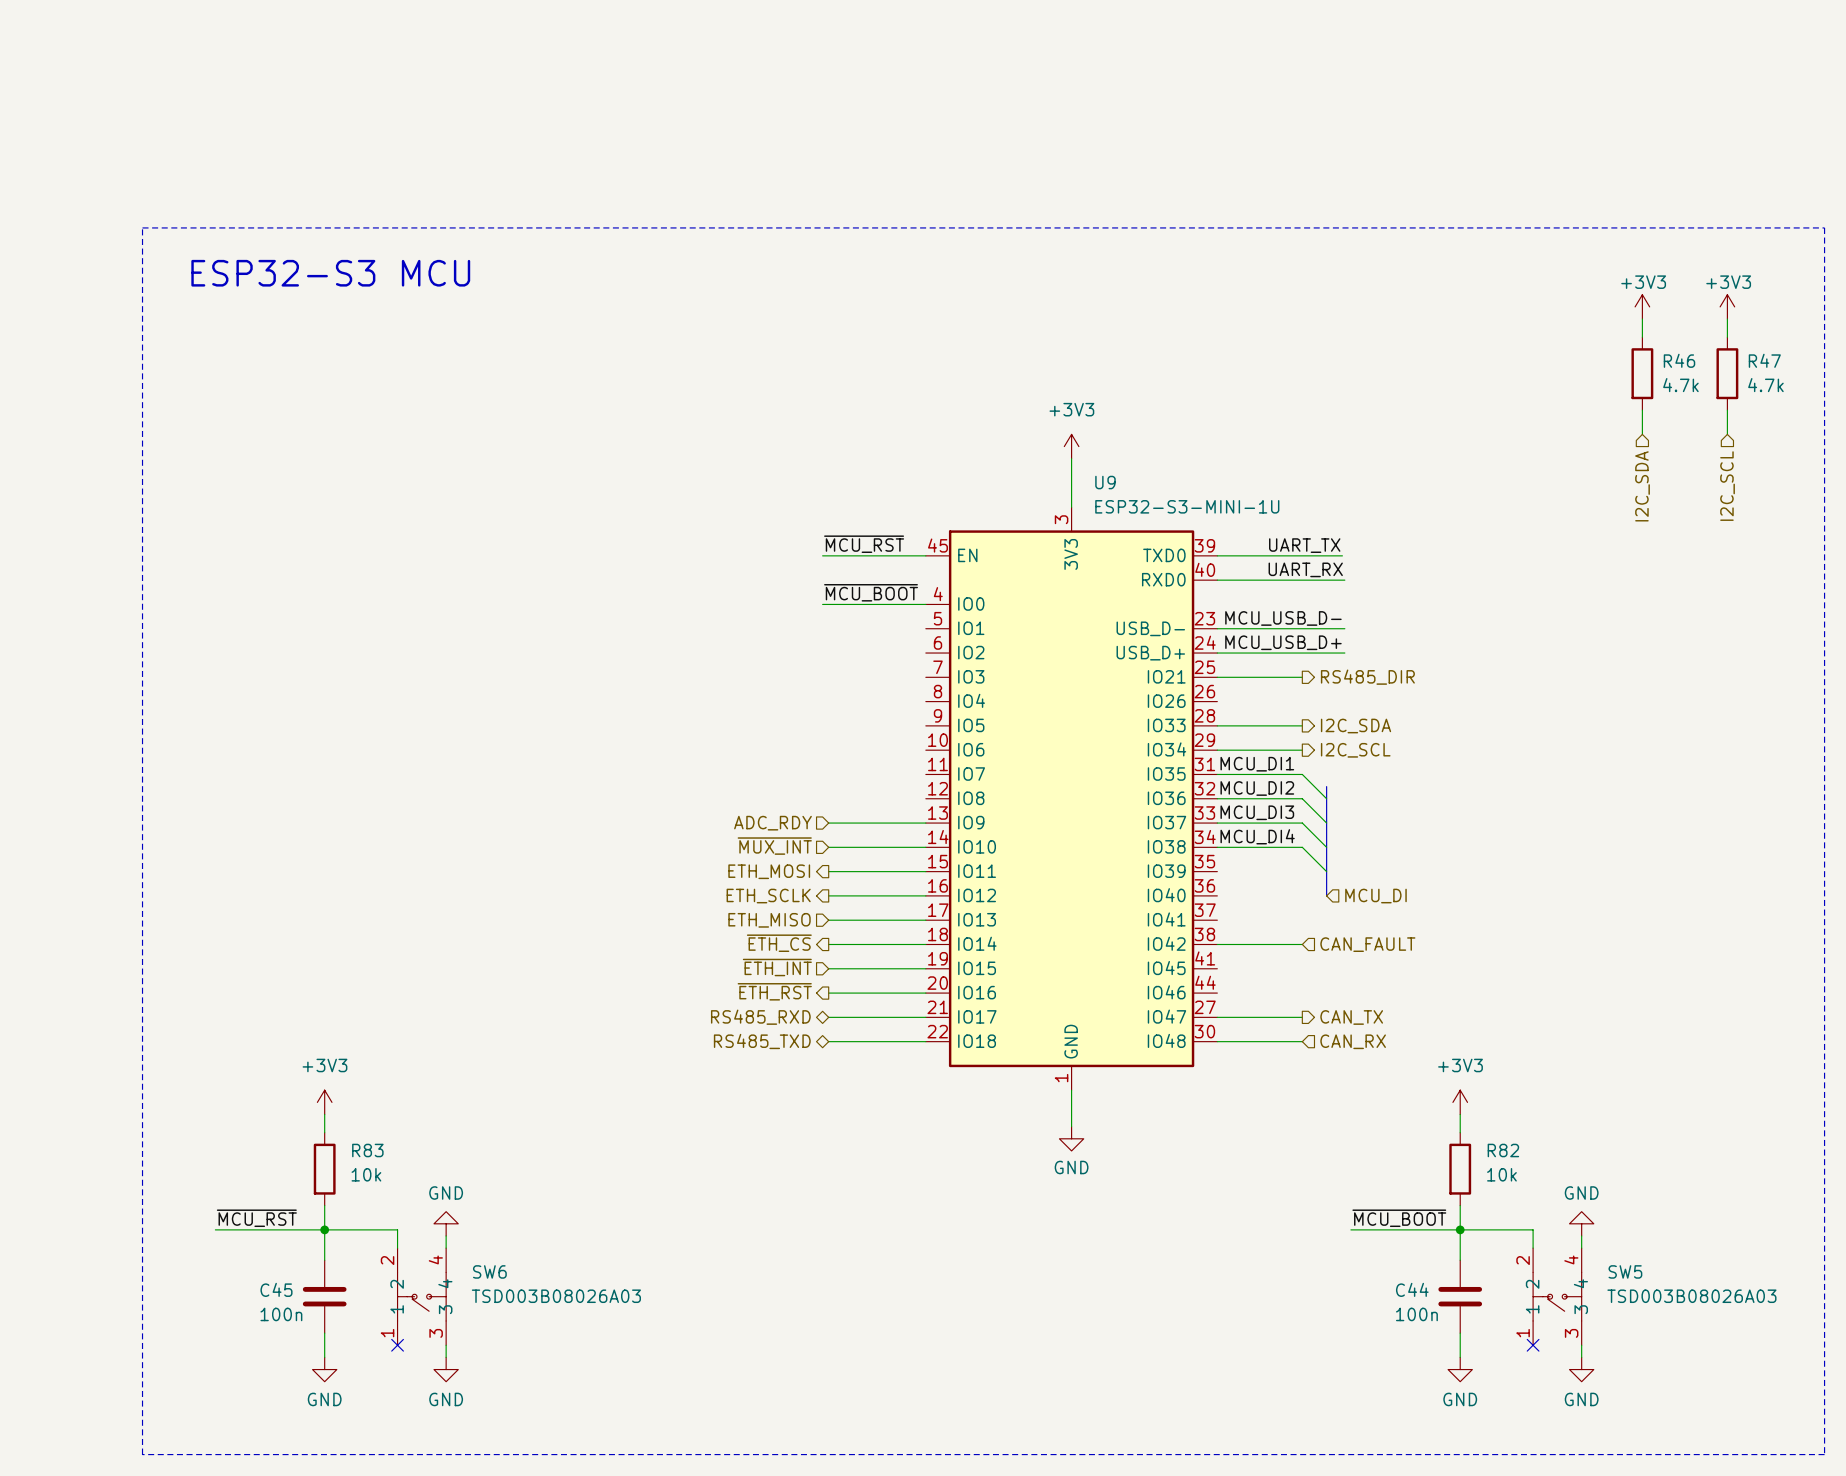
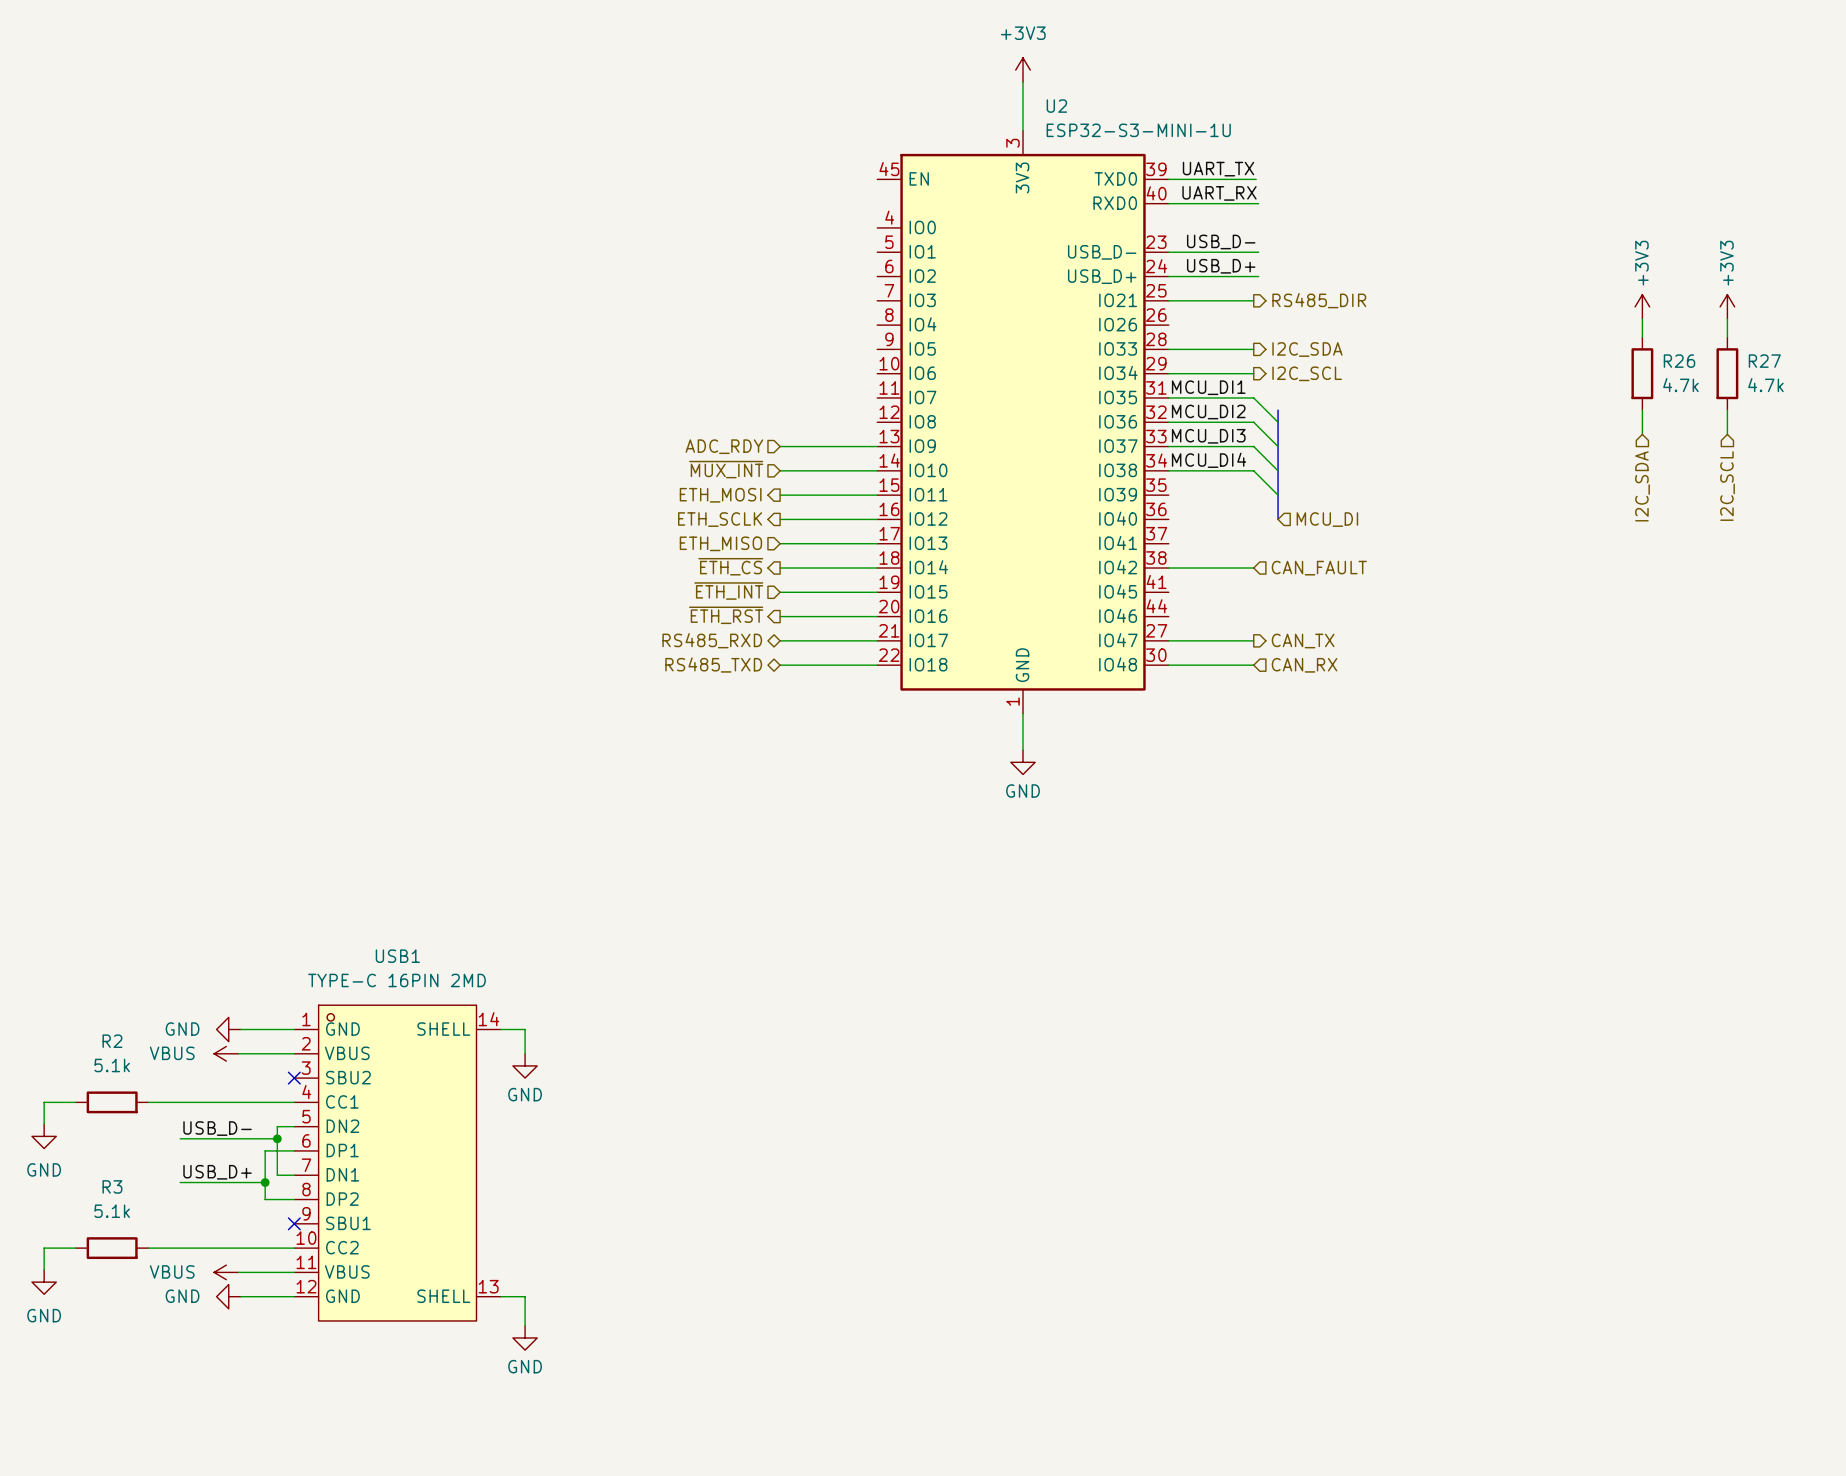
power symbol: none -> +3V3 (1023, 70)
wire: none -> (1023, 82) (1023, 130)
label: none -> UART_TX (1218, 169)
wire: none -> (1168, 179) (1256, 179)
label: none -> UART_RX (1219, 193)
wire: none -> (1168, 203) (1258, 203)
line: (142, 227) (1824, 227) (1824, 1454) (142, 1454) (142, 227) -> none
label: none -> USB_D- (1221, 241)
wire: none -> (1168, 252) (1258, 252)
label: none -> USB_D+ (1221, 266)
text: ESP32-S3 MCU (330, 273) -> none
wire: none -> (1168, 276) (1258, 276)
power symbol text rotation: 0° (1643, 282) -> 90° counterclockwise (1641, 263)
power symbol text rotation: 0° (1728, 282) -> 90° counterclockwise (1726, 263)
wire: none -> (1168, 300) (1253, 300)
hierarchical label: none -> RS485_DIR (1319, 300)
wire: none -> (1168, 349) (1253, 349)
hierarchical label: none -> I2C_SDA (1307, 349)
R46 name: R46 (1679, 360) -> R26 (1679, 361)
R47 name: R47 (1764, 360) -> R27 (1764, 361)
wire: none -> (1168, 373) (1253, 373)
hierarchical label: none -> I2C_SCL (1307, 373)
label: none -> MCU_DI1 (1208, 387)
wire: none -> (1168, 397) (1253, 397) (1278, 422)
bus: none -> (1278, 410) (1278, 519)
label: none -> MCU_DI2 (1208, 412)
U2: none -> ESP32-S3-MINI-1U (1023, 422)
wire: none -> (1168, 422) (1253, 422) (1278, 446)
label: none -> MCU_DI3 (1208, 436)
hierarchical label: none -> ADC_RDY (724, 446)
wire: none -> (780, 446) (877, 446)
power symbol: +3V3 (1071, 446) -> none
wire: none -> (1168, 446) (1253, 446) (1278, 470)
label: none -> MCU_DI4 (1209, 460)
hierarchical label: none -> ~{MUX_INT} (726, 469)
wire: none -> (780, 470) (877, 470)
wire: none -> (1168, 470) (1253, 470) (1278, 495)
hierarchical label: none -> ETH_MOSI (720, 495)
wire: none -> (780, 495) (877, 495)
hierarchical label: none -> ETH_SCLK (720, 519)
wire: none -> (780, 519) (877, 519)
hierarchical label: none -> MCU_DI (1327, 519)
hierarchical label: none -> ETH_MISO (720, 543)
wire: none -> (780, 543) (877, 543)
label: ~{MCU_RST} (864, 544) -> none
label: UART_TX (1304, 545) -> none
wire: (822, 555) (925, 555) -> none
wire: (1217, 555) (1342, 555) -> none
hierarchical label: none -> ~{ETH_CS} (730, 566)
wire: none -> (780, 568) (877, 568)
hierarchical label: none -> CAN_FAULT (1319, 568)
label: UART_RX (1305, 569) -> none
wire: (1217, 580) (1344, 580) -> none
hierarchical label: none -> ~{ETH_INT} (728, 591)
label: ~{MCU_BOOT} (871, 592) -> none
wire: (822, 604) (925, 604) -> none
hierarchical label: none -> ~{ETH_RST} (726, 615)
label: MCU_USB_D- (1283, 618) -> none
wire: (1217, 628) (1344, 628) -> none
hierarchical label: none -> RS485_RXD (712, 640)
hierarchical label: none -> CAN_TX (1303, 641)
label: MCU_USB_D+ (1283, 642) -> none
wire: (1217, 653) (1344, 653) -> none
hierarchical label: none -> RS485_TXD (713, 665)
hierarchical label: none -> CAN_RX (1304, 665)
wire: (1217, 677) (1302, 677) -> (1168, 665) (1253, 665)
hierarchical label: RS485_DIR (1367, 677) -> none
wire: (1217, 725) (1302, 725) -> (1168, 640) (1253, 640)
hierarchical label: I2C_SDA (1356, 726) -> none
wire: (1217, 750) (1302, 750) -> (1168, 568) (1253, 568)
hierarchical label: I2C_SCL (1355, 750) -> none
power symbol: none -> GND (1023, 762)
label: MCU_DI1 (1257, 764) -> none
wire: (1217, 774) (1302, 774) (1326, 798) -> none
bus: (1326, 786) (1326, 895) -> none
label: MCU_DI2 (1257, 788) -> none
U9: ESP32-S3-MINI-1U (1071, 798) -> none
wire: (1217, 798) (1302, 798) (1326, 823) -> none
label: MCU_DI3 (1257, 812) -> none
hierarchical label: ADC_RDY (772, 823) -> none
wire: (828, 823) (925, 823) -> (780, 592) (877, 592)
wire: (1217, 823) (1302, 823) (1326, 847) -> none
label: MCU_DI4 (1257, 836) -> none
hierarchical label: ~{MUX_INT} (774, 846) -> none
wire: (828, 847) (925, 847) -> (780, 616) (877, 616)
wire: (1217, 847) (1302, 847) (1326, 871) -> none
hierarchical label: ETH_MOSI (769, 871) -> none
wire: (828, 871) (925, 871) -> (780, 640) (877, 640)
wire: (828, 895) (925, 895) -> (780, 665) (877, 665)
hierarchical label: ETH_SCLK (768, 896) -> none
hierarchical label: MCU_DI (1375, 896) -> none
hierarchical label: ETH_MISO (769, 920) -> none
wire: (828, 920) (925, 920) -> none
hierarchical label: ~{ETH_CS} (779, 943) -> none
wire: (828, 944) (925, 944) -> none
wire: (1217, 944) (1302, 944) -> none
hierarchical label: CAN_FAULT (1367, 944) -> none
hierarchical label: ~{ETH_INT} (777, 967) -> none
wire: (828, 968) (925, 968) -> none
hierarchical label: ~{ETH_RST} (774, 991) -> none
wire: (828, 993) (925, 993) -> none
hierarchical label: RS485_RXD (760, 1017) -> none
wire: (828, 1017) (925, 1017) -> none
wire: (1217, 1017) (1302, 1017) -> none
hierarchical label: CAN_TX (1351, 1017) -> none
power symbol: none -> GND (228, 1029)
wire: none -> (240, 1029) (294, 1029)
wire: none -> (500, 1029) (525, 1029) (525, 1053)
hierarchical label: RS485_TXD (762, 1041) -> none
wire: (828, 1041) (925, 1041) -> none
wire: (1217, 1041) (1302, 1041) -> none
hierarchical label: CAN_RX (1353, 1041) -> none
power symbol: none -> VBUS (226, 1053)
wire: none -> (238, 1053) (294, 1053)
power symbol: none -> GND (525, 1065)
no-connect mark: none -> (294, 1078)
wire: (1071, 1090) (1071, 1126) -> none
wire: none -> (75, 1102) (44, 1102) (44, 1124)
R2: none -> 5.1k (112, 1102)
wire: none -> (148, 1102) (294, 1102)
power symbol: +3V3 (324, 1102) -> none
power symbol: +3V3 (1460, 1102) -> none
wire: (1460, 1114) (1460, 1132) -> none
wire: none -> (294, 1126) (277, 1126) (277, 1175) (294, 1175)
label: none -> USB_D- (217, 1128)
power symbol: none -> GND (44, 1136)
wire: none -> (180, 1138) (277, 1138)
junction: none -> (277, 1138)
power symbol: GND (1071, 1138) -> none
wire: none -> (294, 1150) (265, 1150) (265, 1199) (294, 1199)
USB1: none -> TYPE-C 16PIN 2MD (397, 1163)
R83: 10k (324, 1169) -> none
R82: 10k (1460, 1169) -> none
label: none -> USB_D+ (217, 1172)
wire: none -> (180, 1182) (265, 1182)
junction: none -> (265, 1182)
wire: (1460, 1205) (1460, 1260) -> none
label: ~{MCU_RST} (256, 1218) -> none
label: ~{MCU_BOOT} (1399, 1218) -> none
no-connect mark: none -> (294, 1223)
power symbol: GND (446, 1223) -> none
power symbol: GND (1581, 1223) -> none
wire: (215, 1229) (397, 1229) (397, 1248) -> none
junction: (324, 1229) -> none
wire: (1350, 1229) (1533, 1229) (1533, 1248) -> none
junction: (1460, 1229) -> none
wire: (1581, 1235) (1581, 1248) -> none
wire: none -> (75, 1248) (44, 1248) (44, 1269)
R3: none -> 5.1k (112, 1248)
wire: none -> (148, 1248) (294, 1248)
power symbol: none -> VBUS (226, 1272)
wire: none -> (238, 1272) (294, 1272)
power symbol: none -> GND (44, 1282)
power symbol: none -> GND (228, 1296)
wire: none -> (240, 1296) (294, 1296)
C45: 100n (324, 1296) -> none
SW6: TSD003B08026A03 (421, 1296) -> none
wire: none -> (500, 1296) (525, 1296) (525, 1325)
C44: 100n (1460, 1296) -> none
SW5: TSD003B08026A03 (1557, 1296) -> none
wire: (324, 1333) (324, 1357) -> none
wire: (1460, 1333) (1460, 1357) -> none
power symbol: none -> GND (525, 1337)
no-connect mark: (397, 1345) -> none
wire: (446, 1345) (446, 1357) -> none
no-connect mark: (1533, 1345) -> none
wire: (1581, 1345) (1581, 1357) -> none
power symbol: GND (324, 1369) -> none
power symbol: GND (446, 1369) -> none
power symbol: GND (1460, 1369) -> none
power symbol: GND (1581, 1369) -> none

